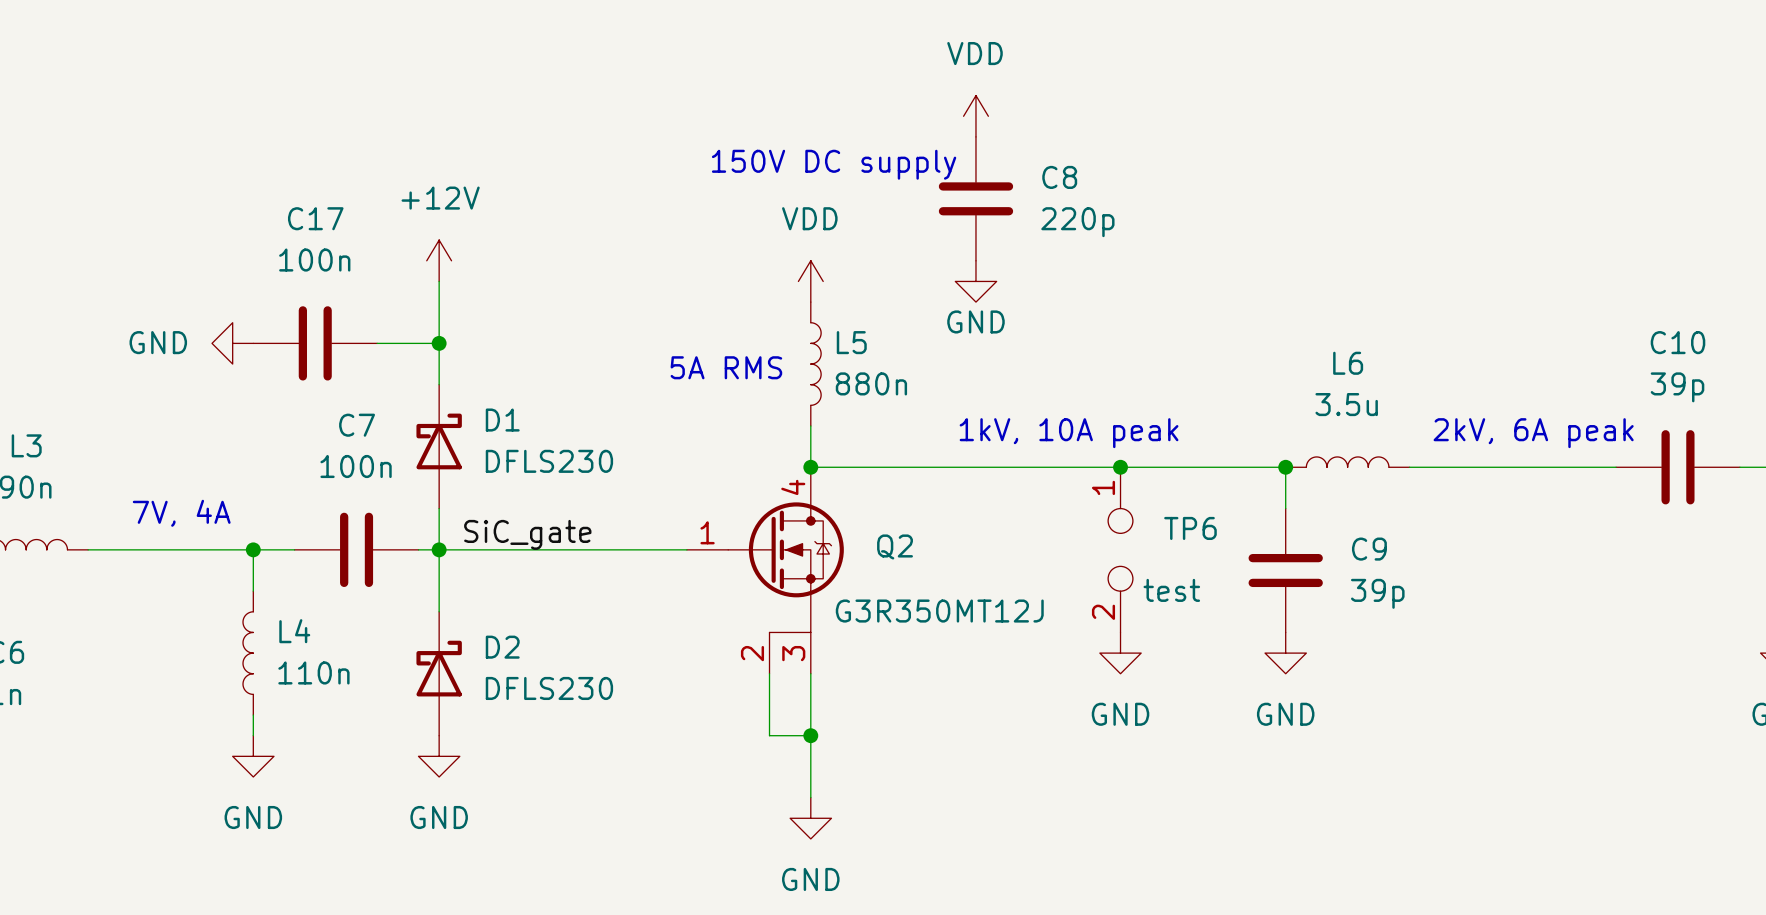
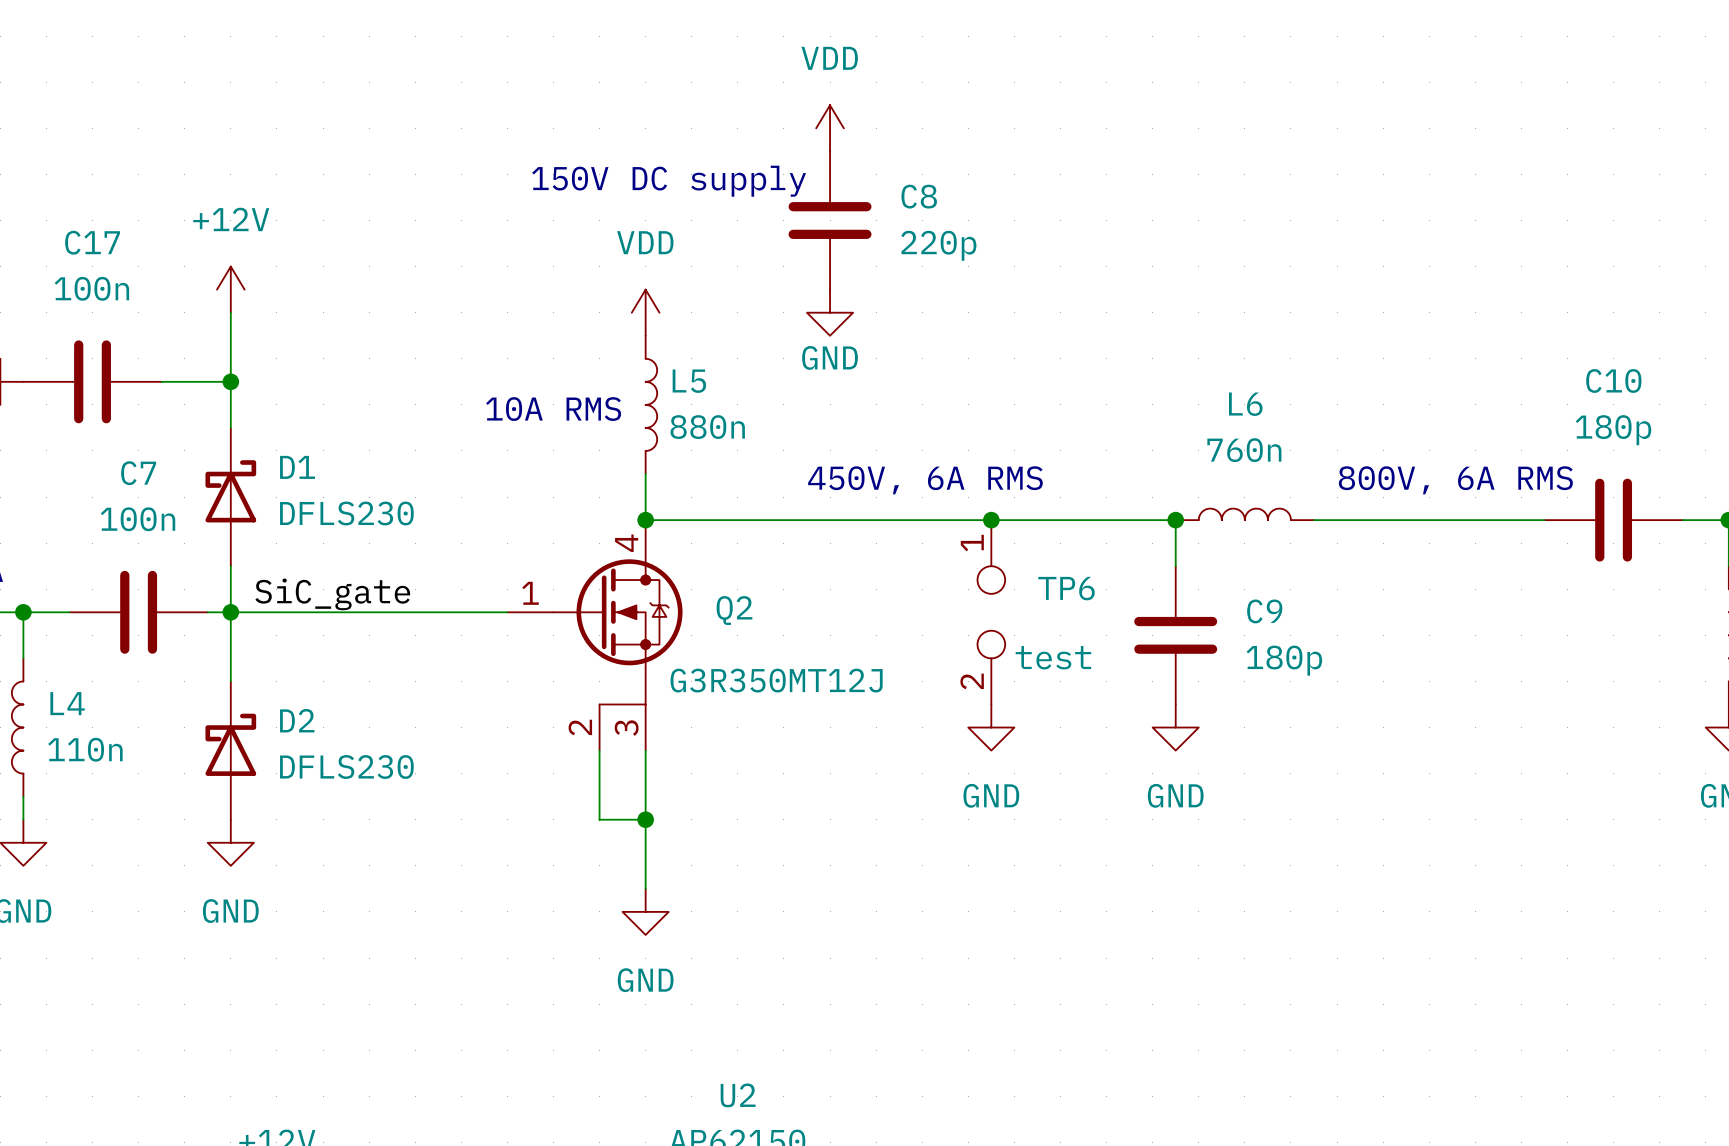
text: 5A RMS (726, 367) -> 10A RMS (553, 409)
C10 value: 39p (1677, 387) -> 180p (1613, 430)
L6 value: 3.5u (1346, 404) -> 760n (1244, 450)
text: 1kV, 10A peak (1069, 433) -> 450V, 6A RMS (925, 480)
text: 2kV, 6A peak (1533, 433) -> 800V, 6A RMS (1455, 480)
C9 value: 39p (1377, 593) -> 180p (1284, 660)

